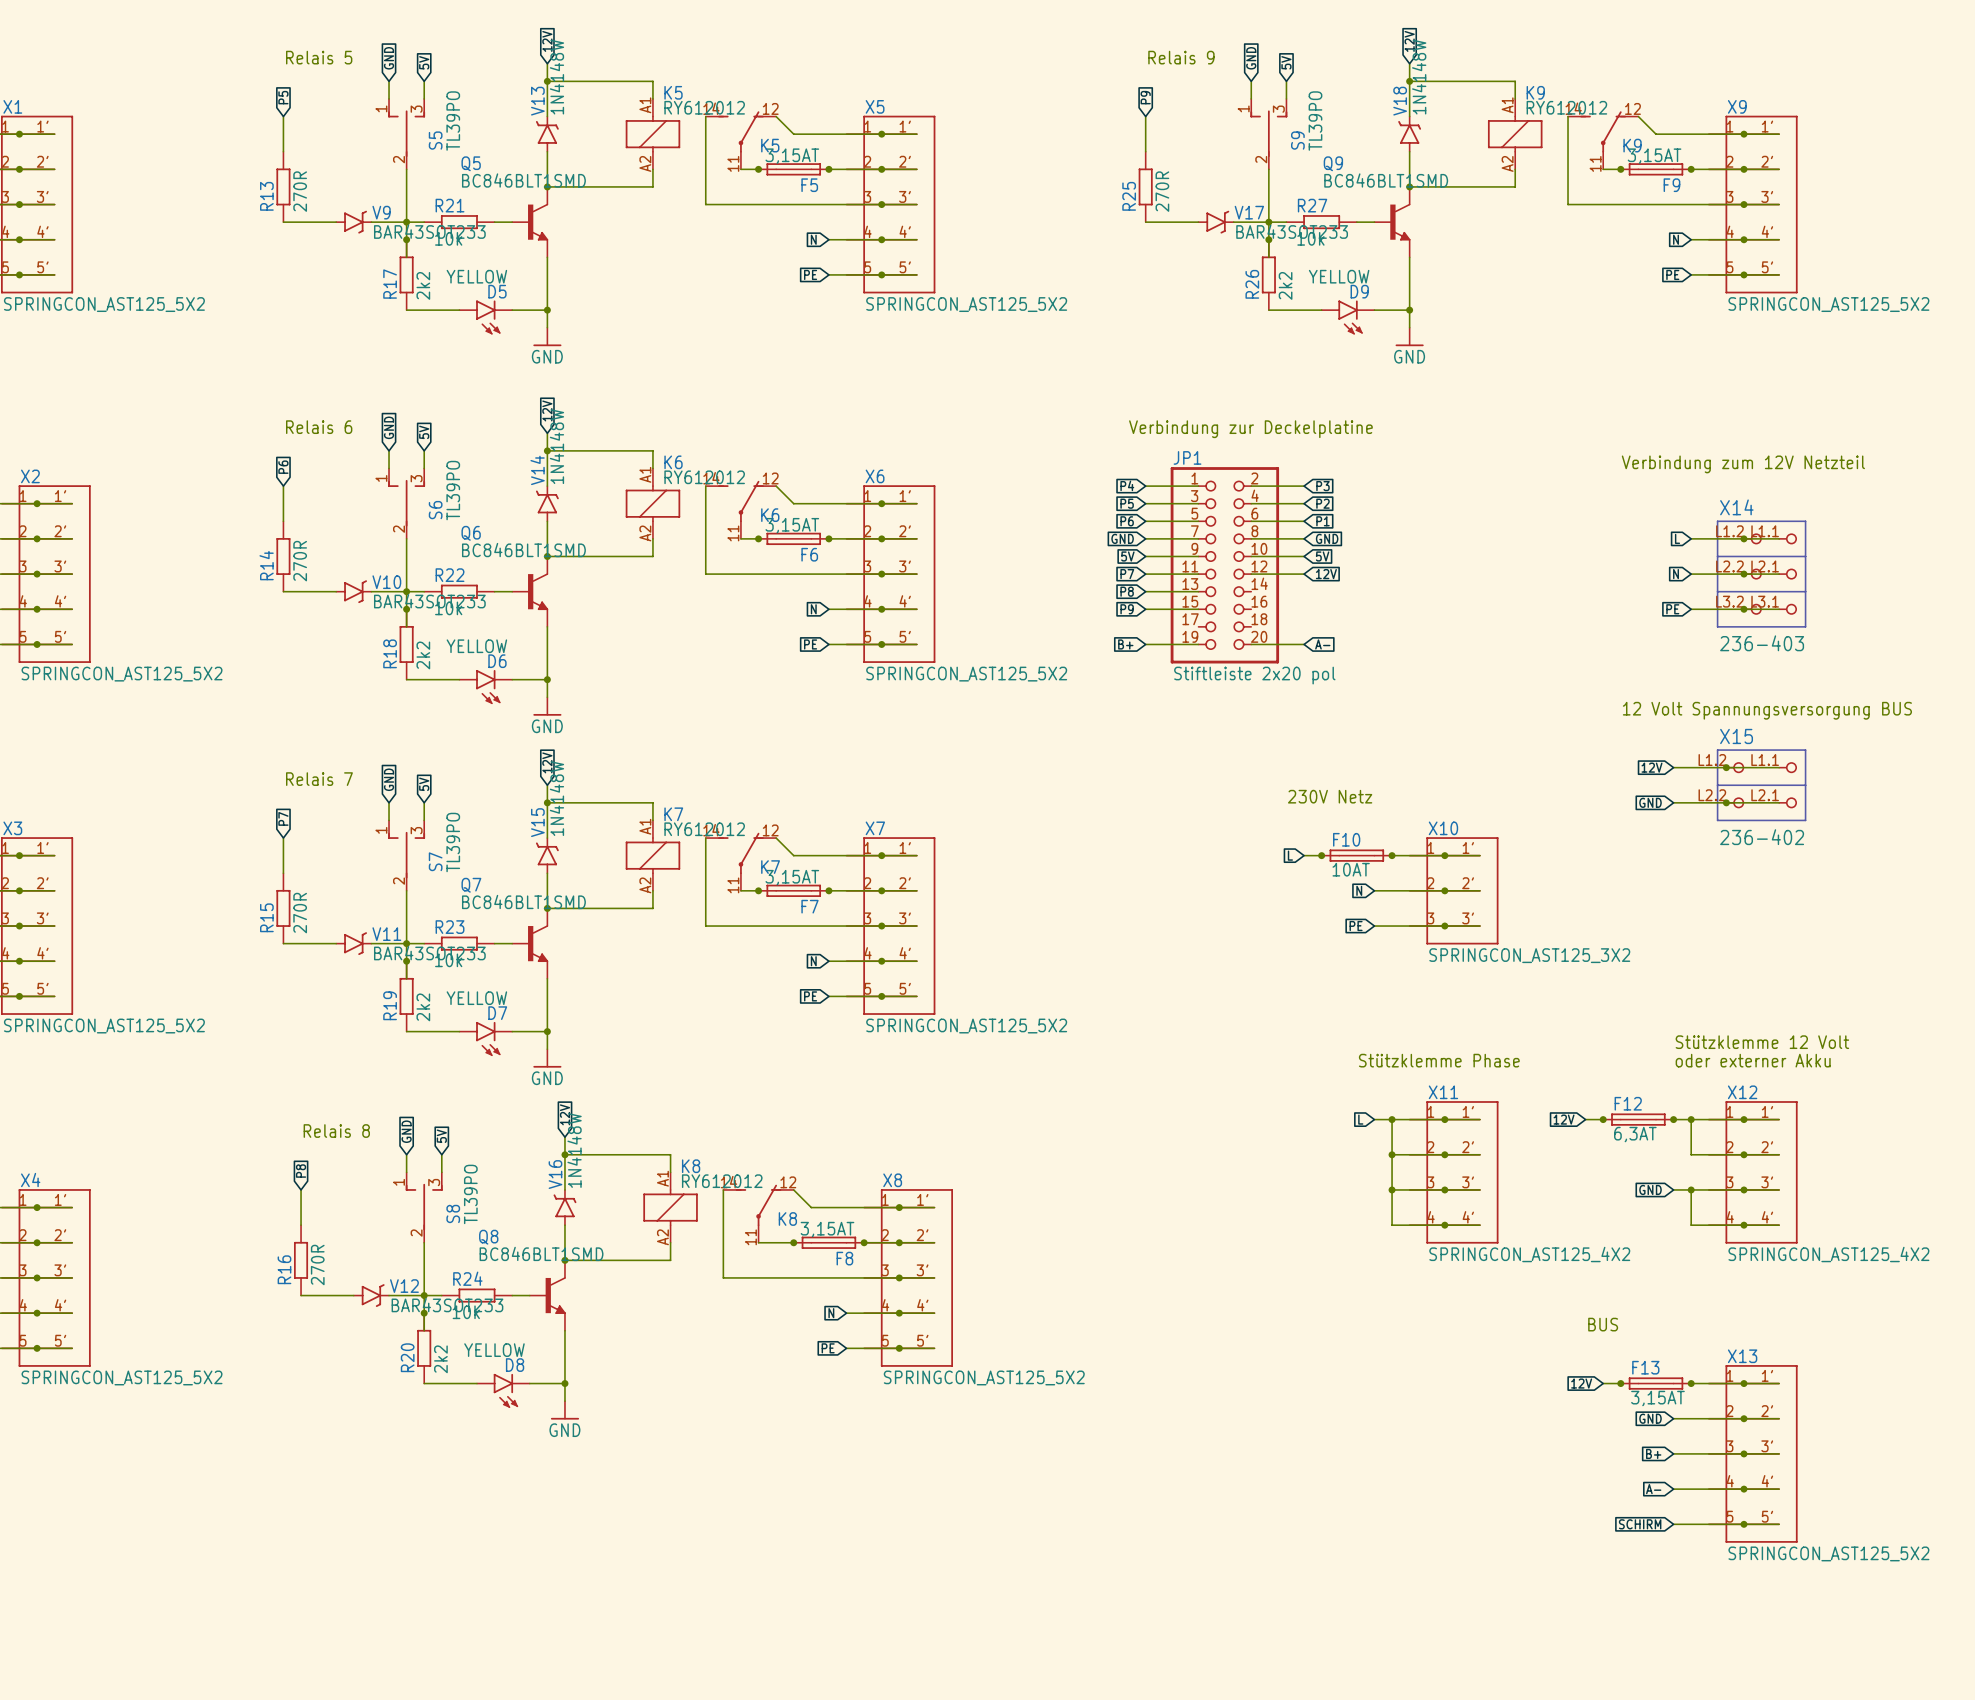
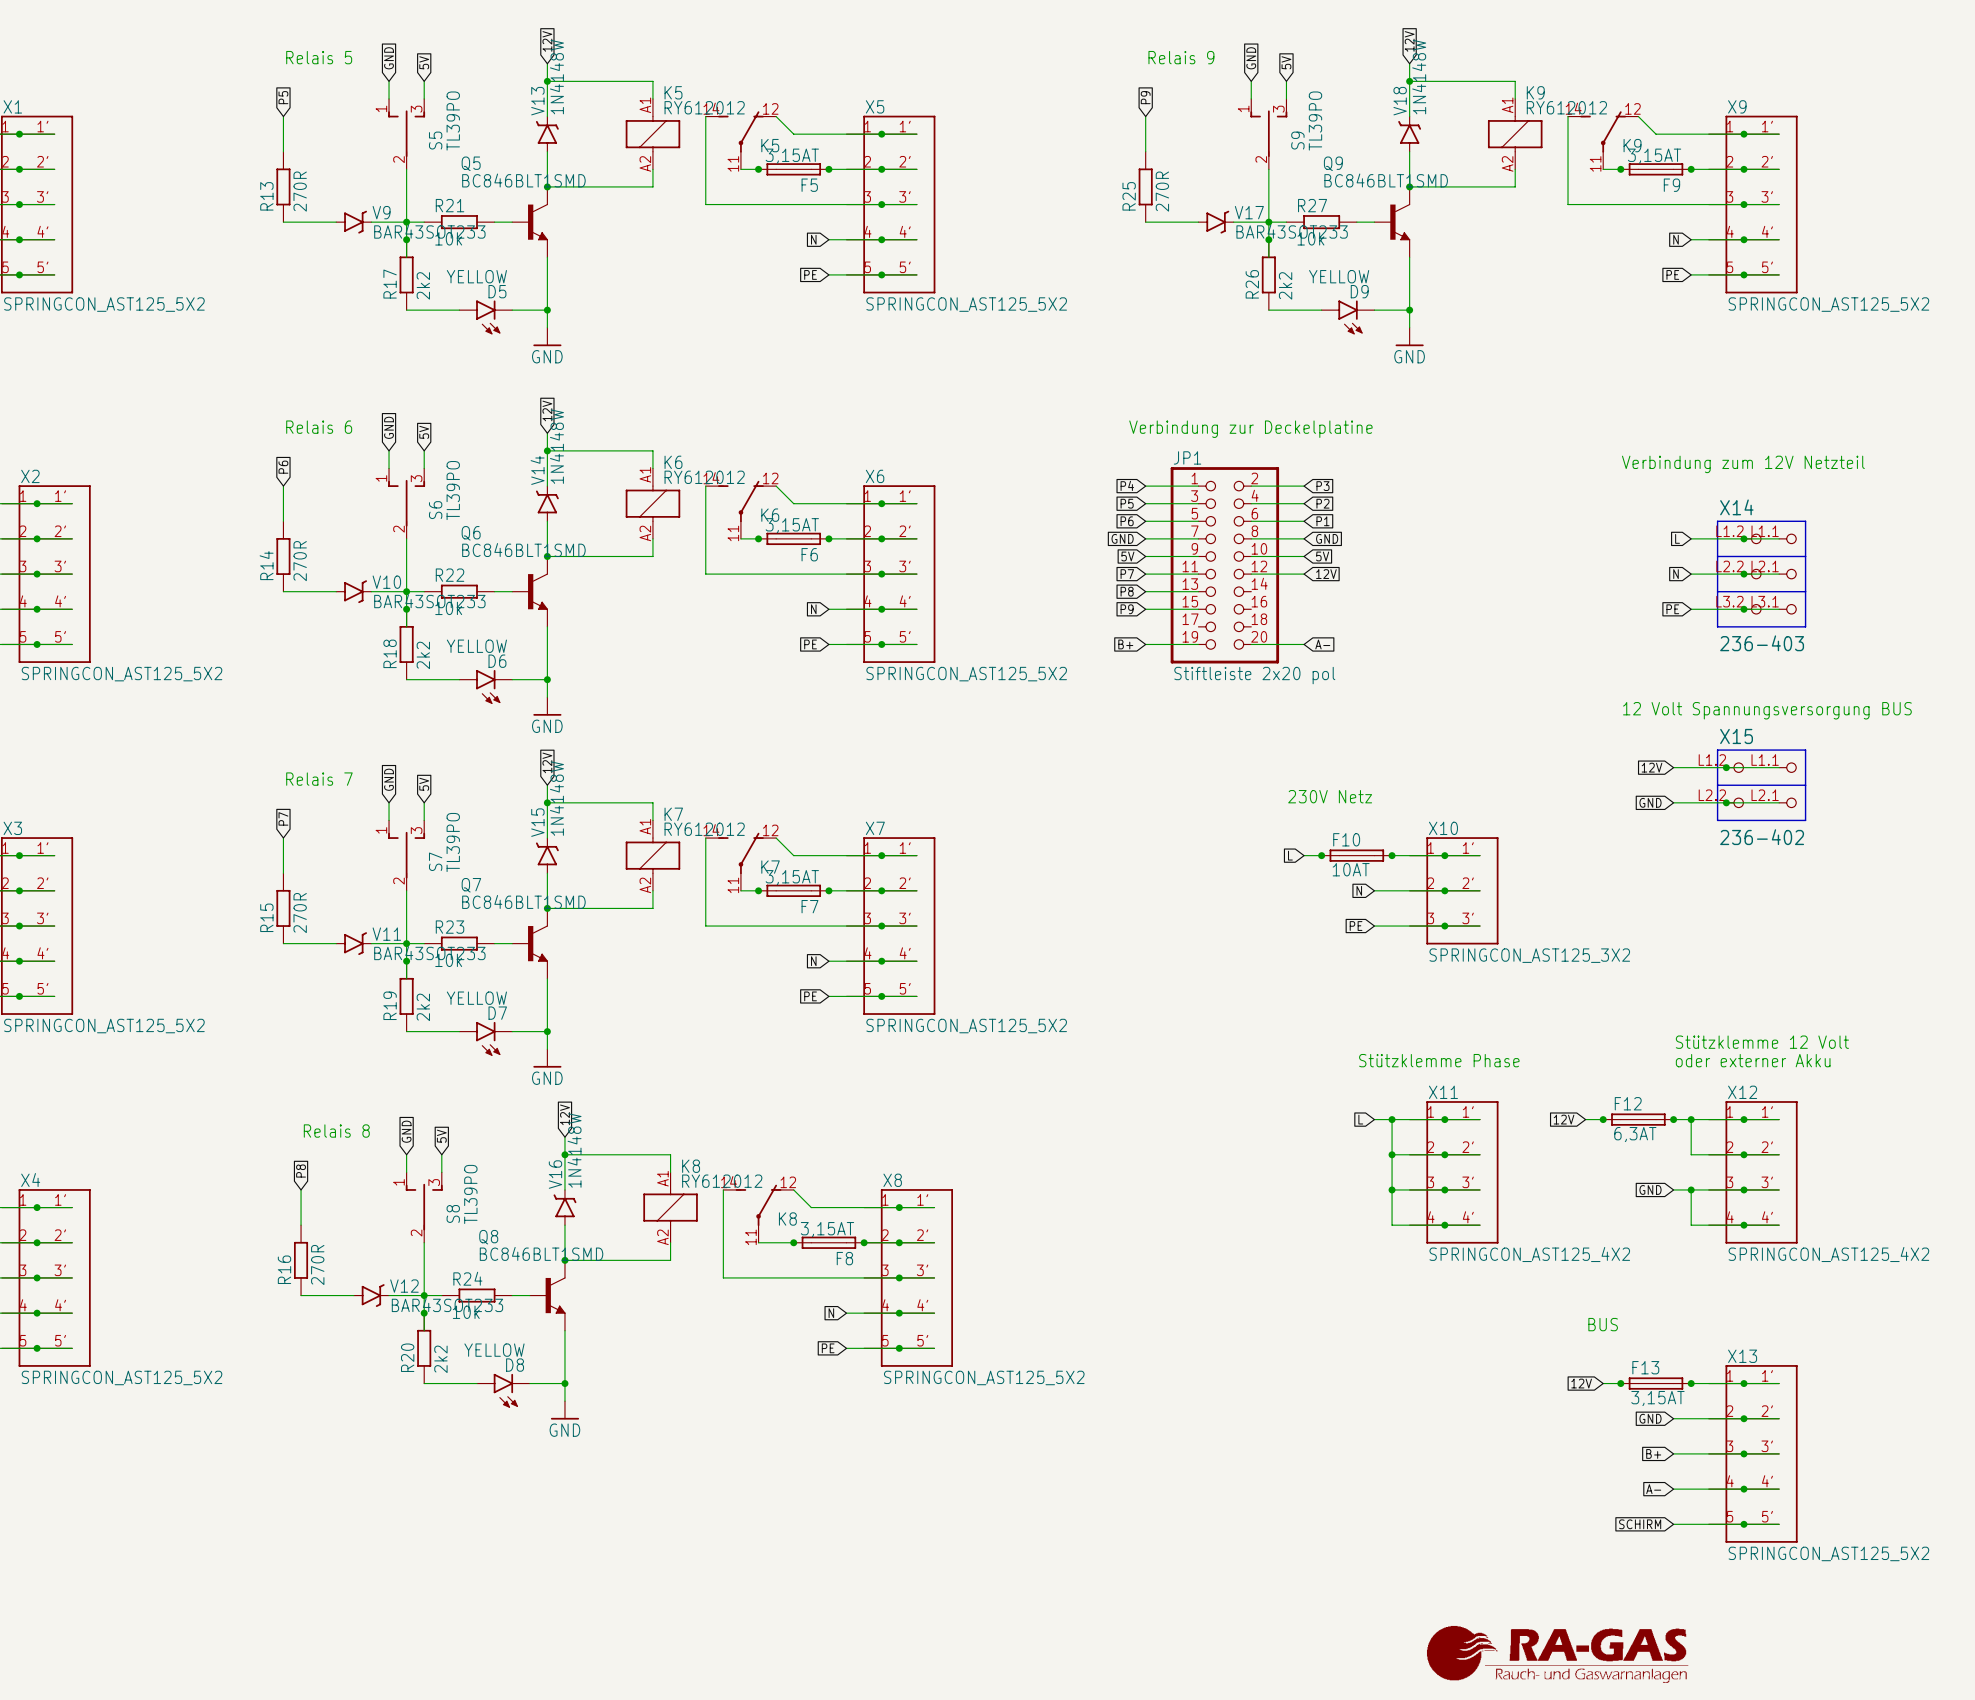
part: none -> (1557, 1654)

